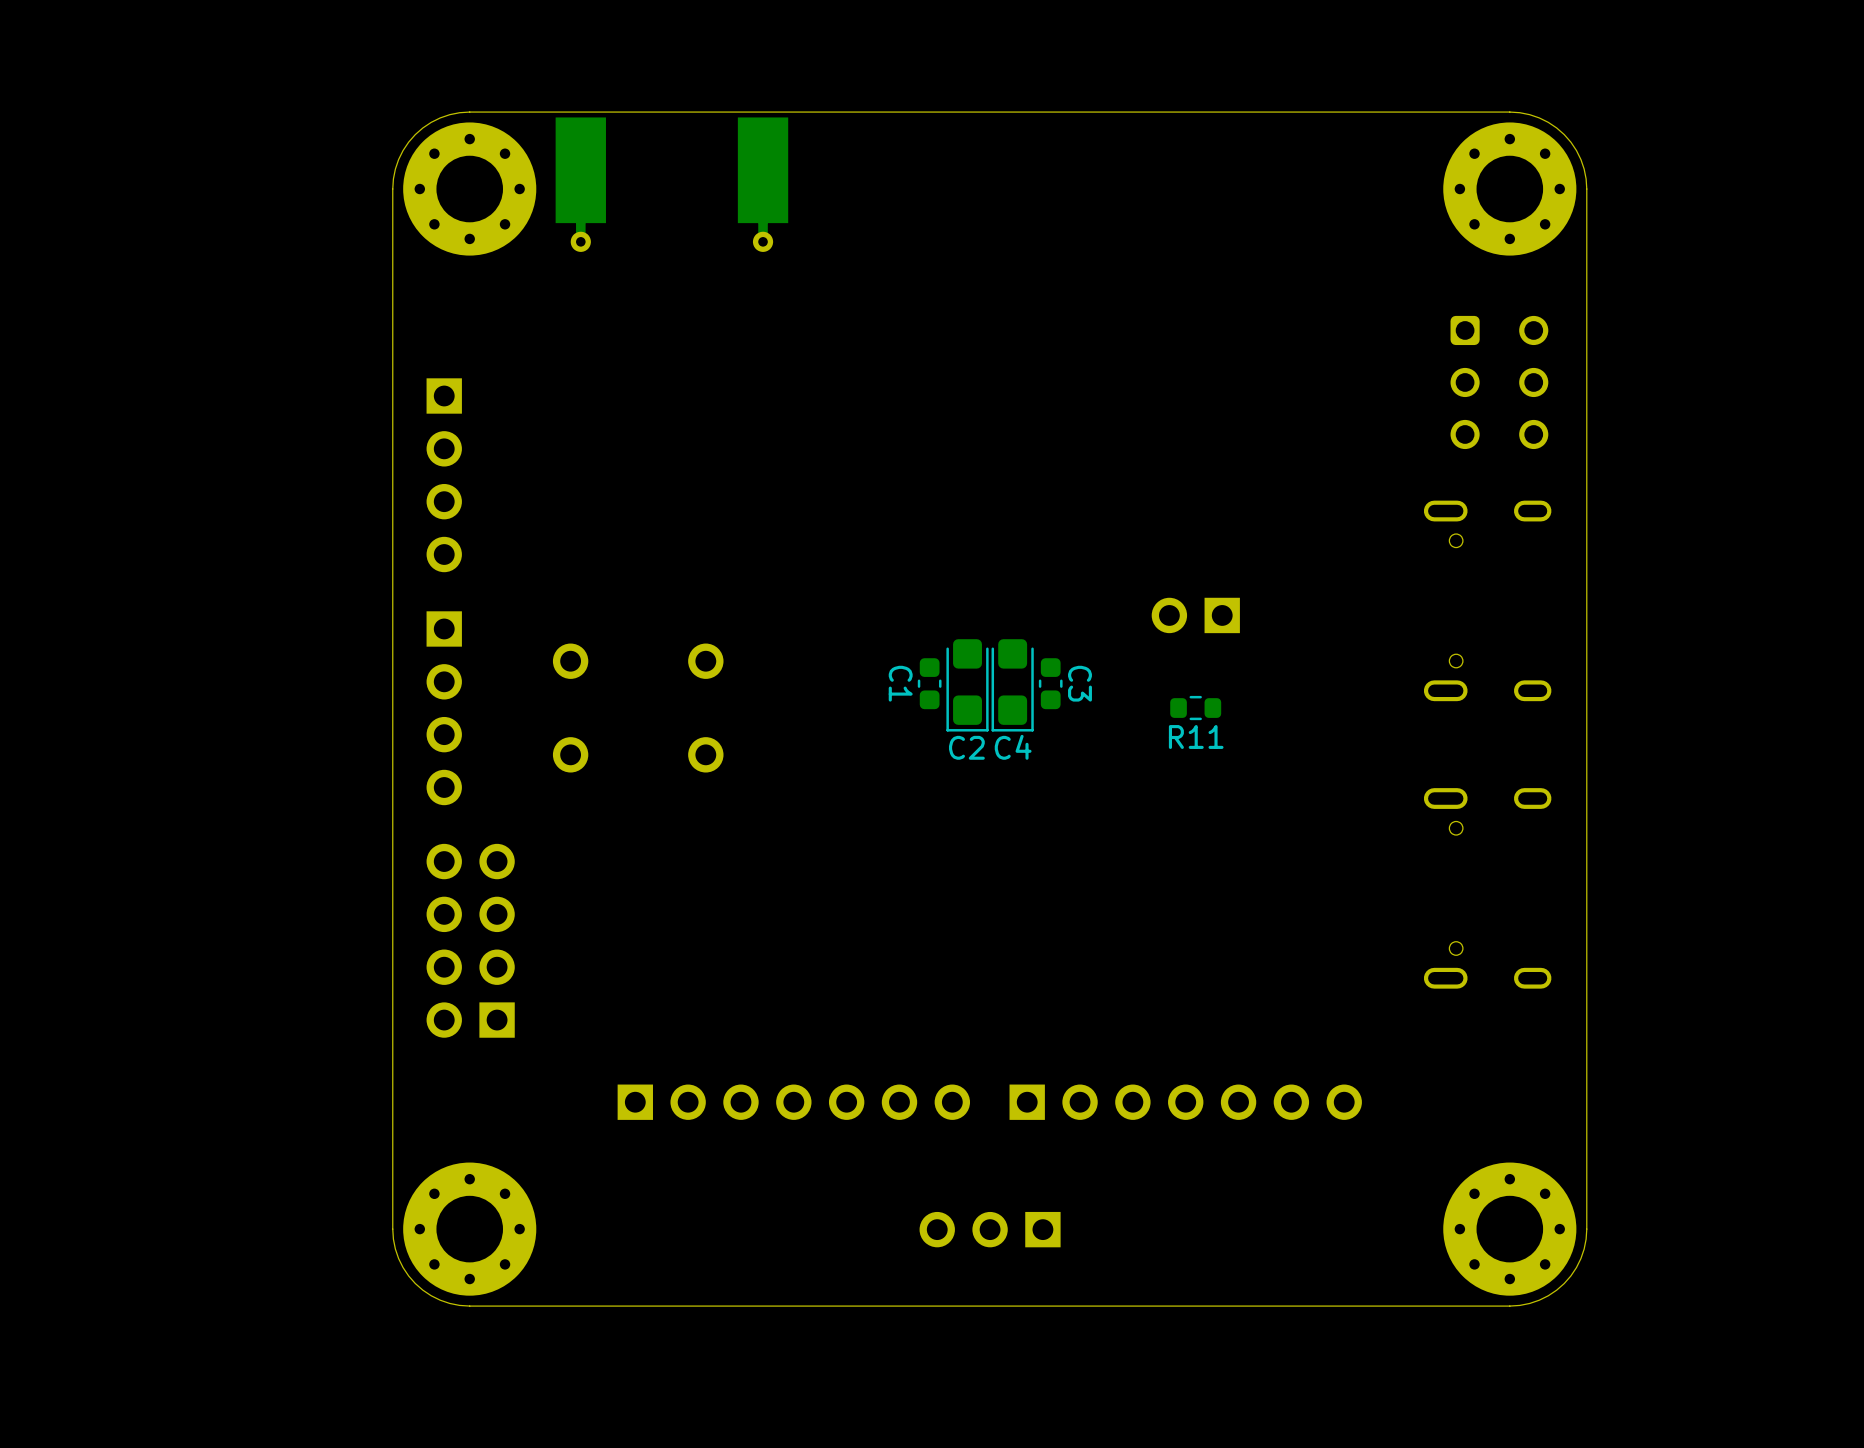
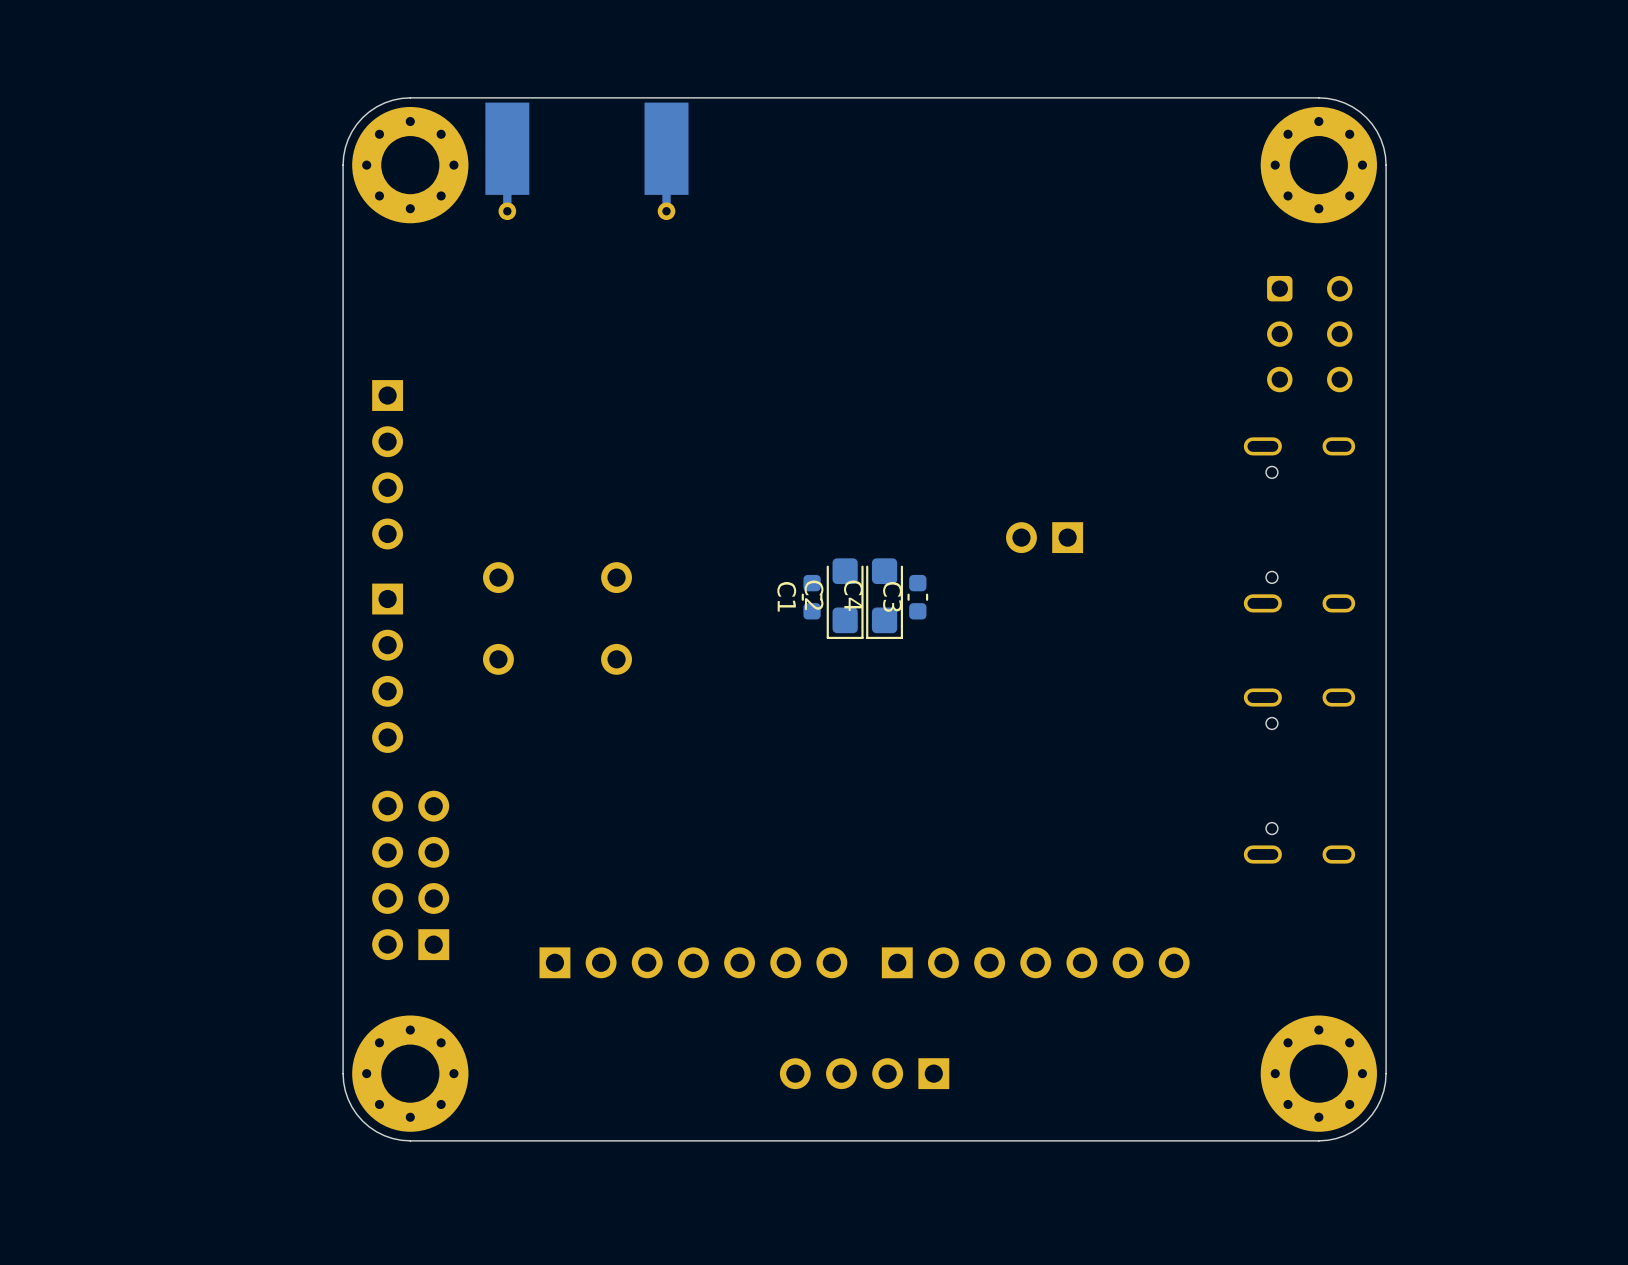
part position: (444, 475) -> (387, 464)
C3 name position: C3 (1079, 683) -> C3 (892, 596)
part position: (444, 708) -> (387, 668)
R11: (1195, 708) -> none
C2 name rotation: 0° (966, 747) -> 90° clockwise (814, 595)
C2 name position: C2 (966, 747) -> C2 (814, 595)
C4 name rotation: 0° (1013, 747) -> 90° clockwise (853, 595)
C4 name position: C4 (1013, 747) -> C4 (853, 595)
part position: (470, 940) -> (410, 875)
part footprint: [919, 1211, 1061, 1248] -> [779, 1058, 950, 1090]

